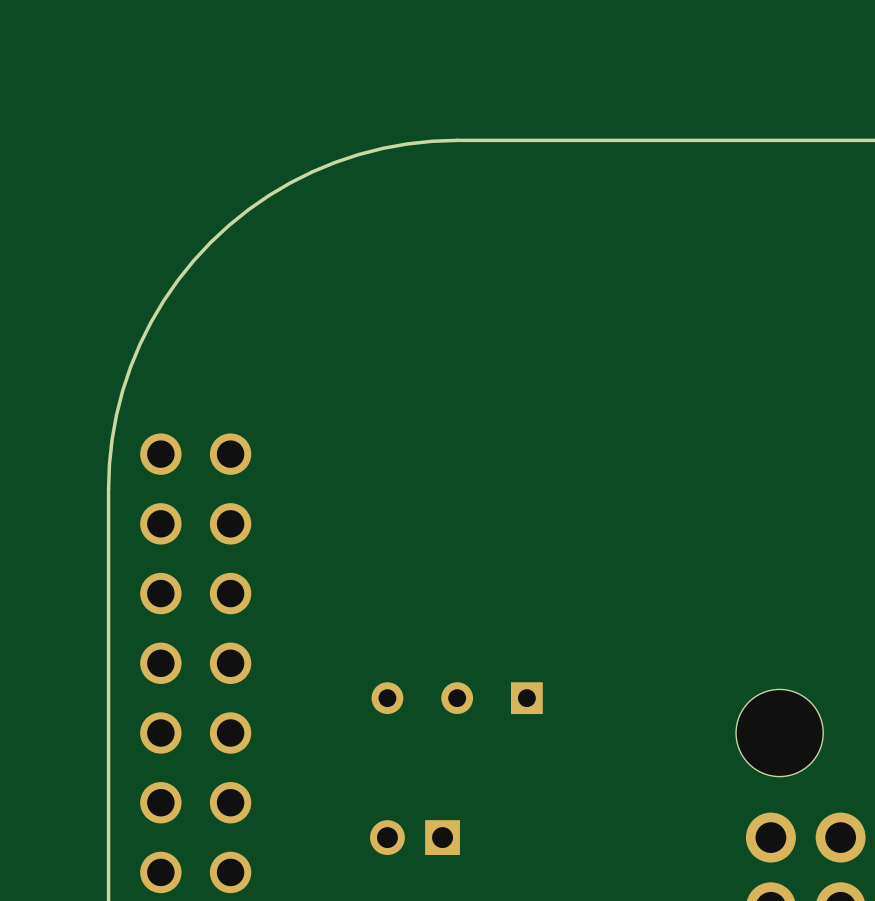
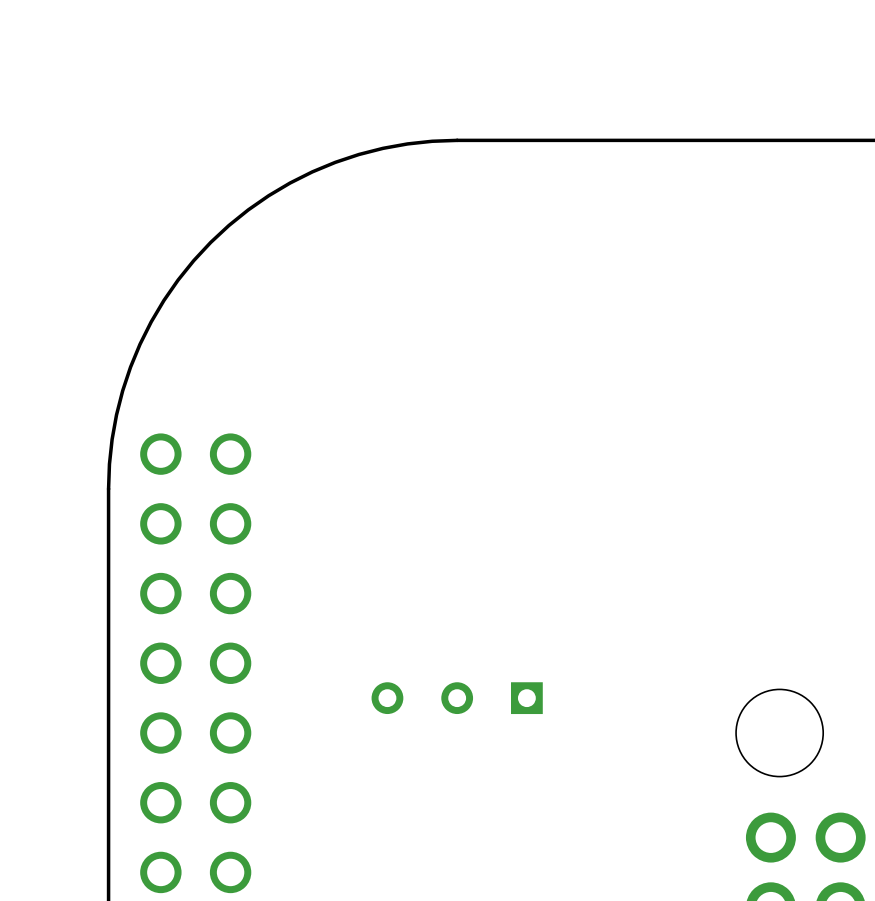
part: (414, 837) -> none

